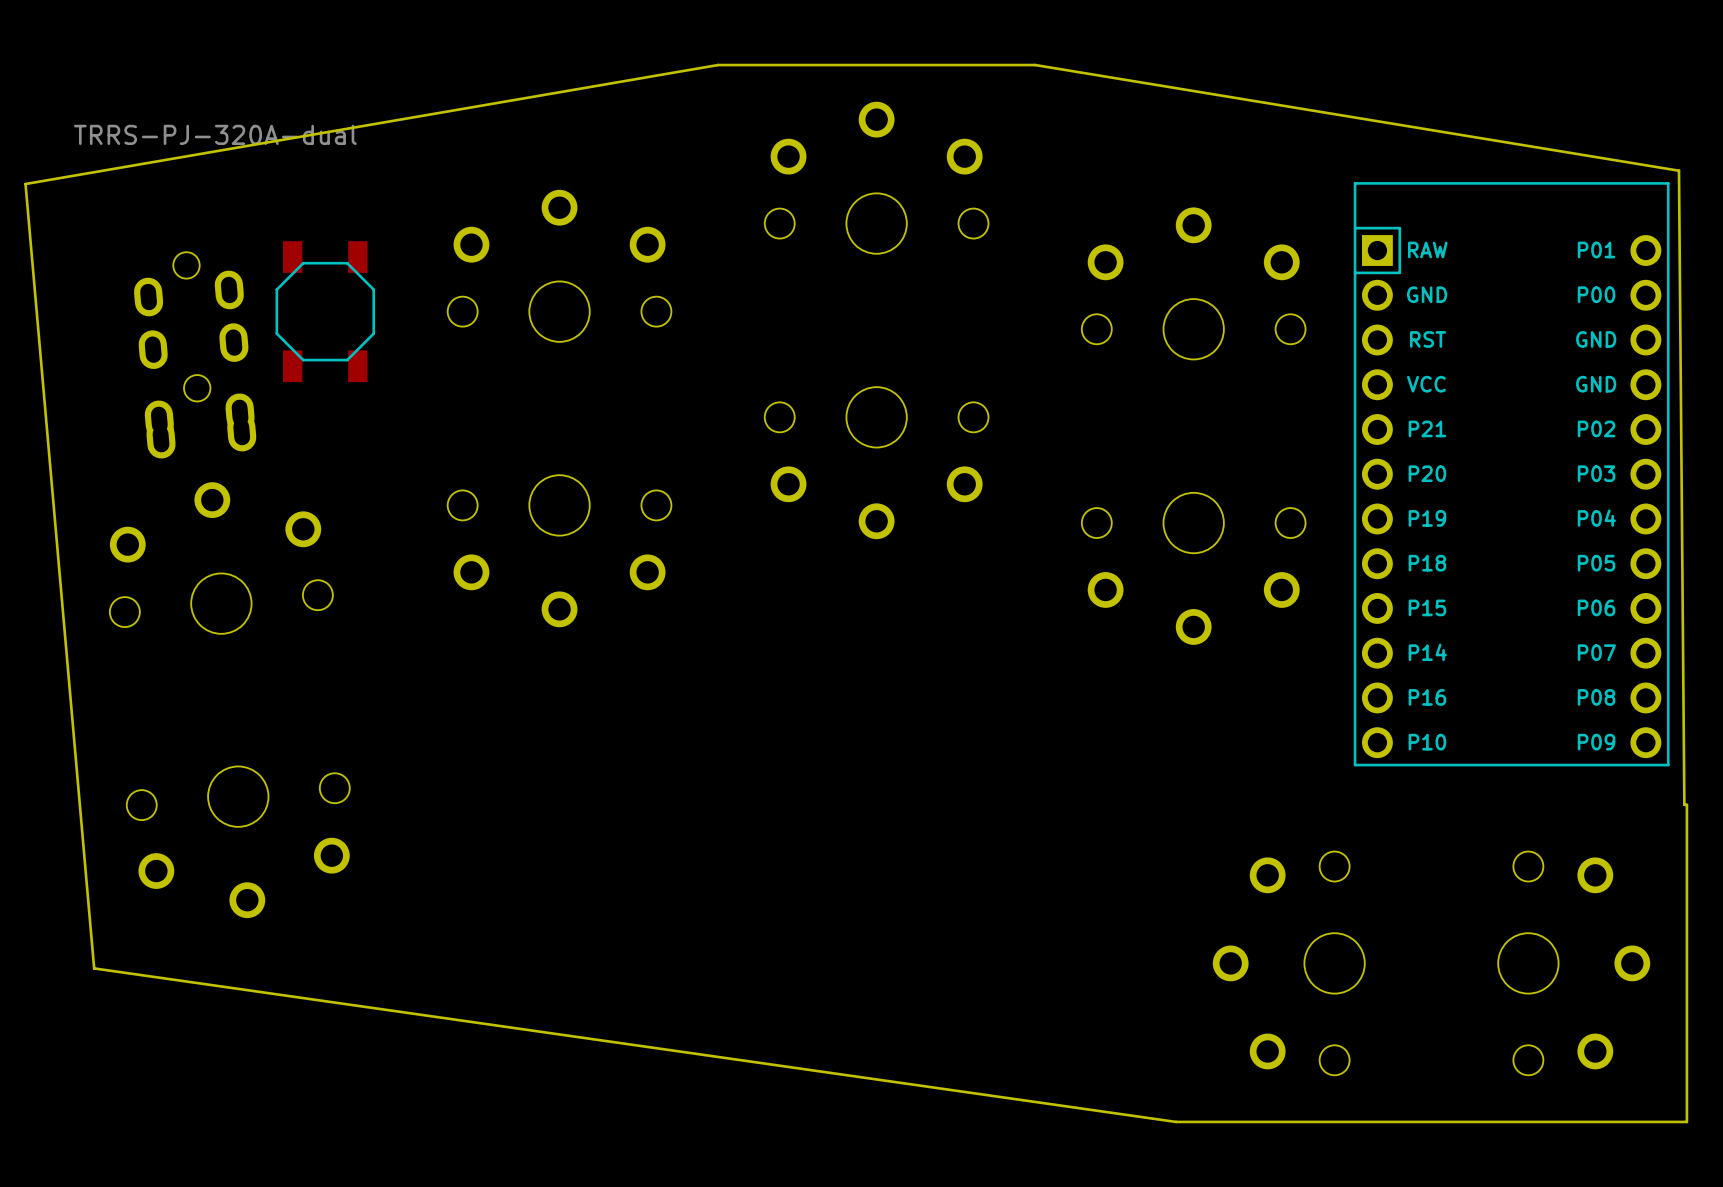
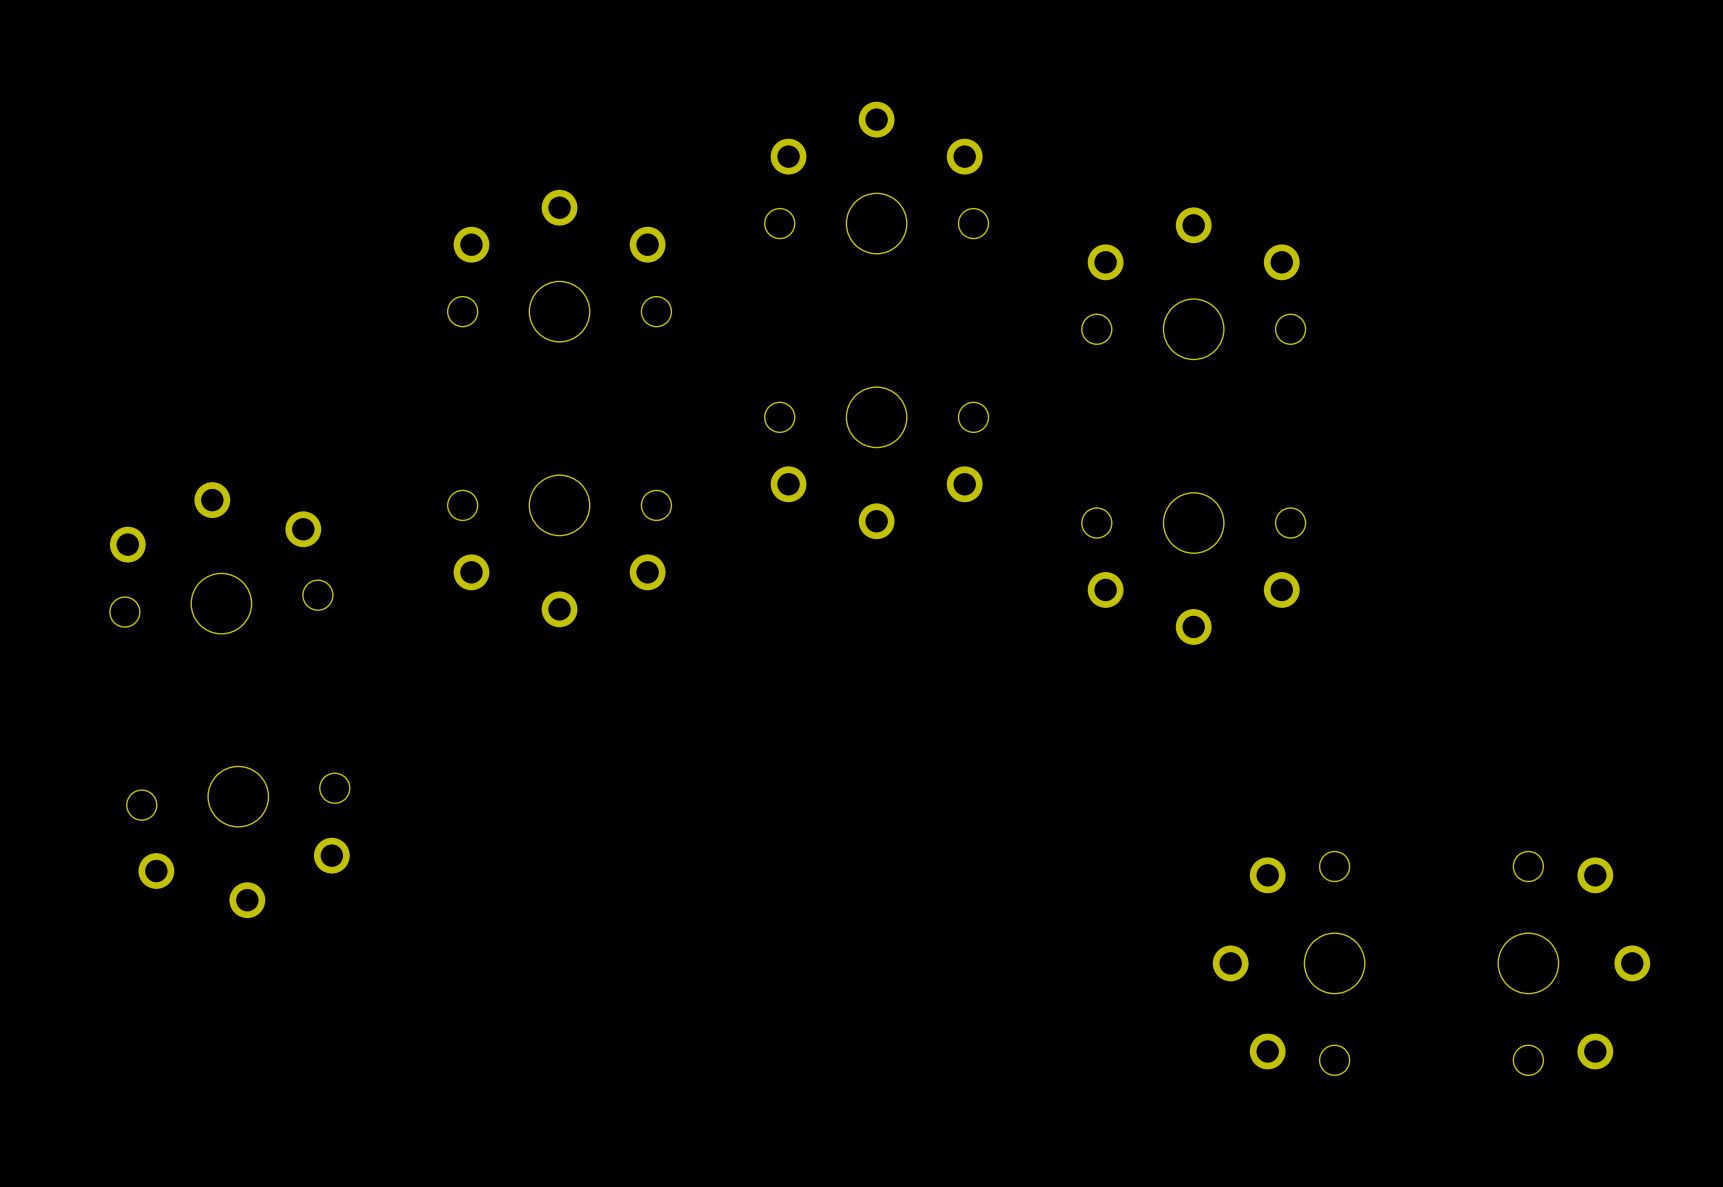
board edge: (718, 65) (1035, 65) (1678, 170) (1684, 804) (1686, 804) (1686, 1121) (1176, 1121) (94, 968) (25, 184) (718, 65) -> none
part: (325, 311) -> none
part: TRRS-PJ-320A-dual (195, 355) -> none
part: (1511, 474) -> none

